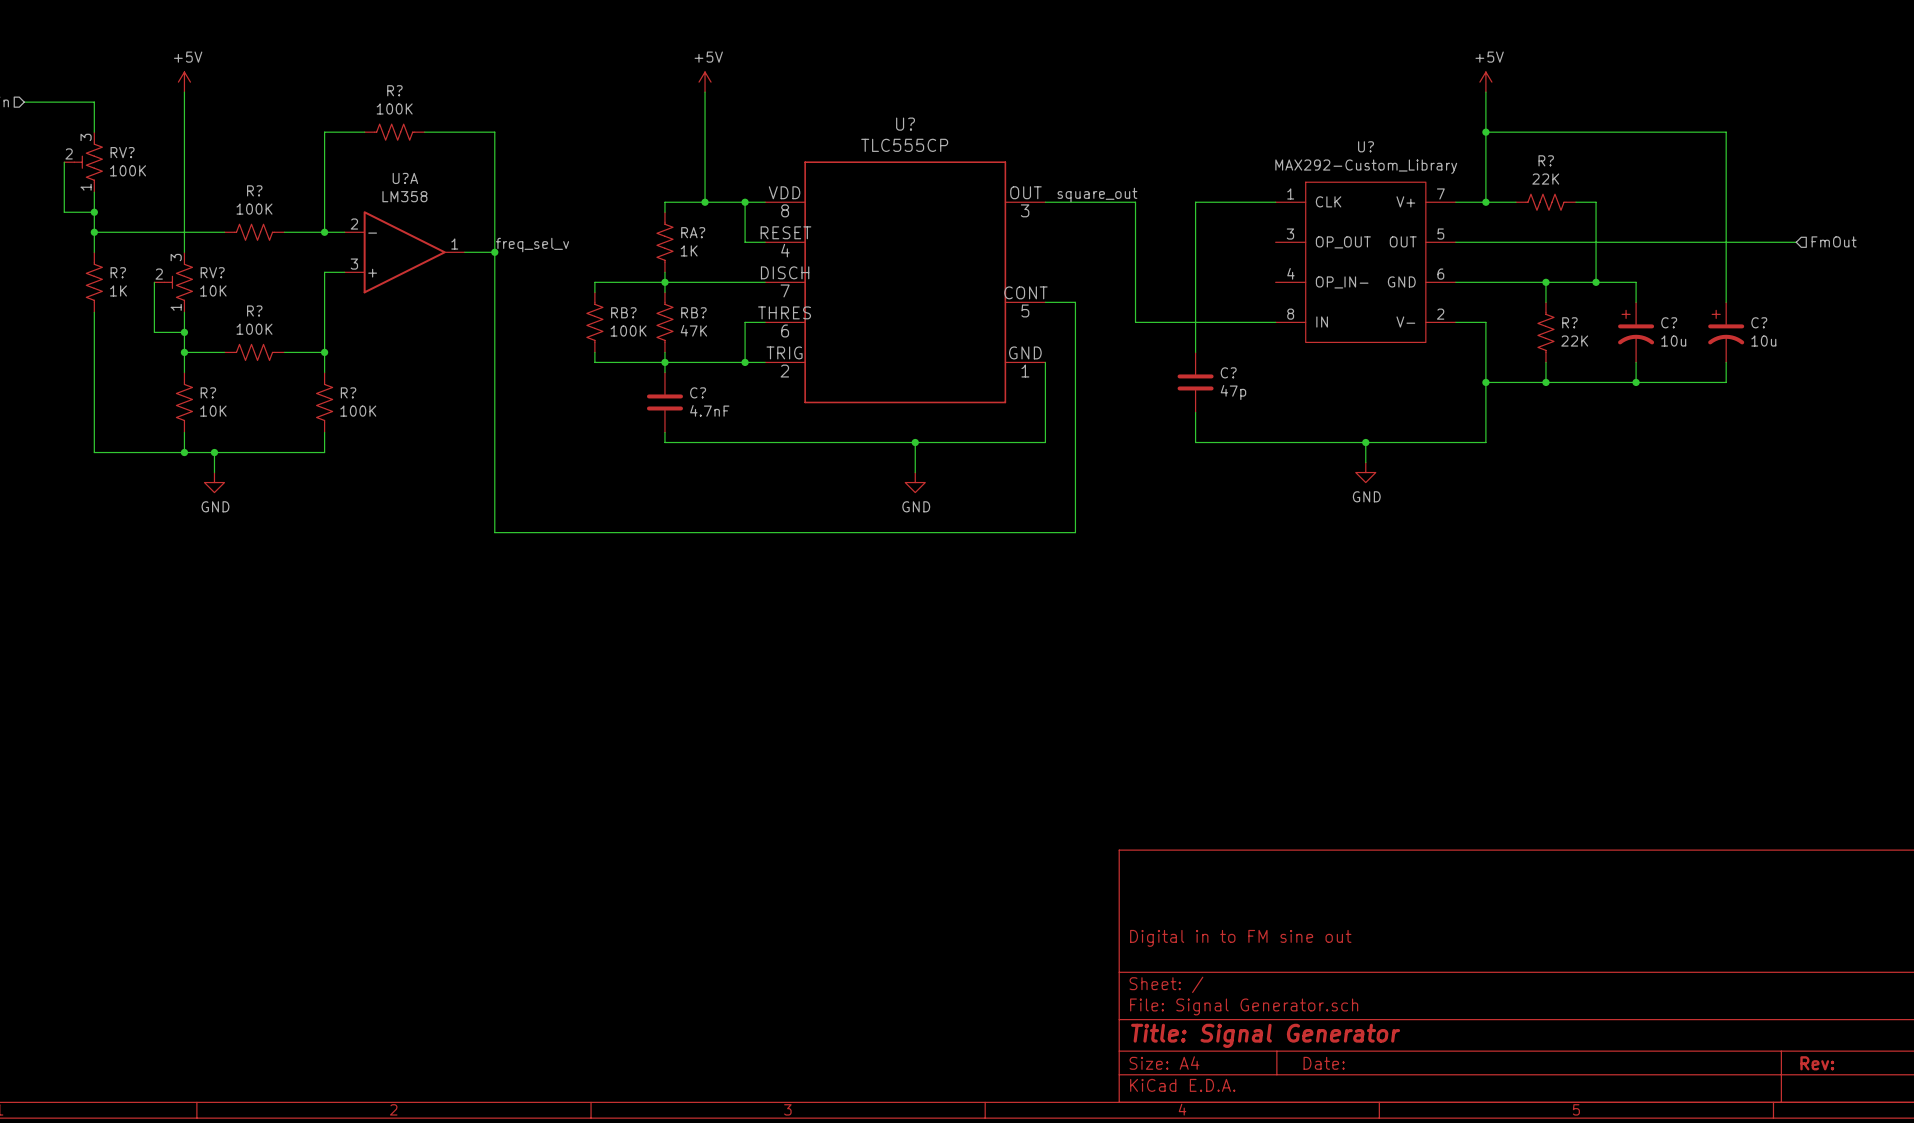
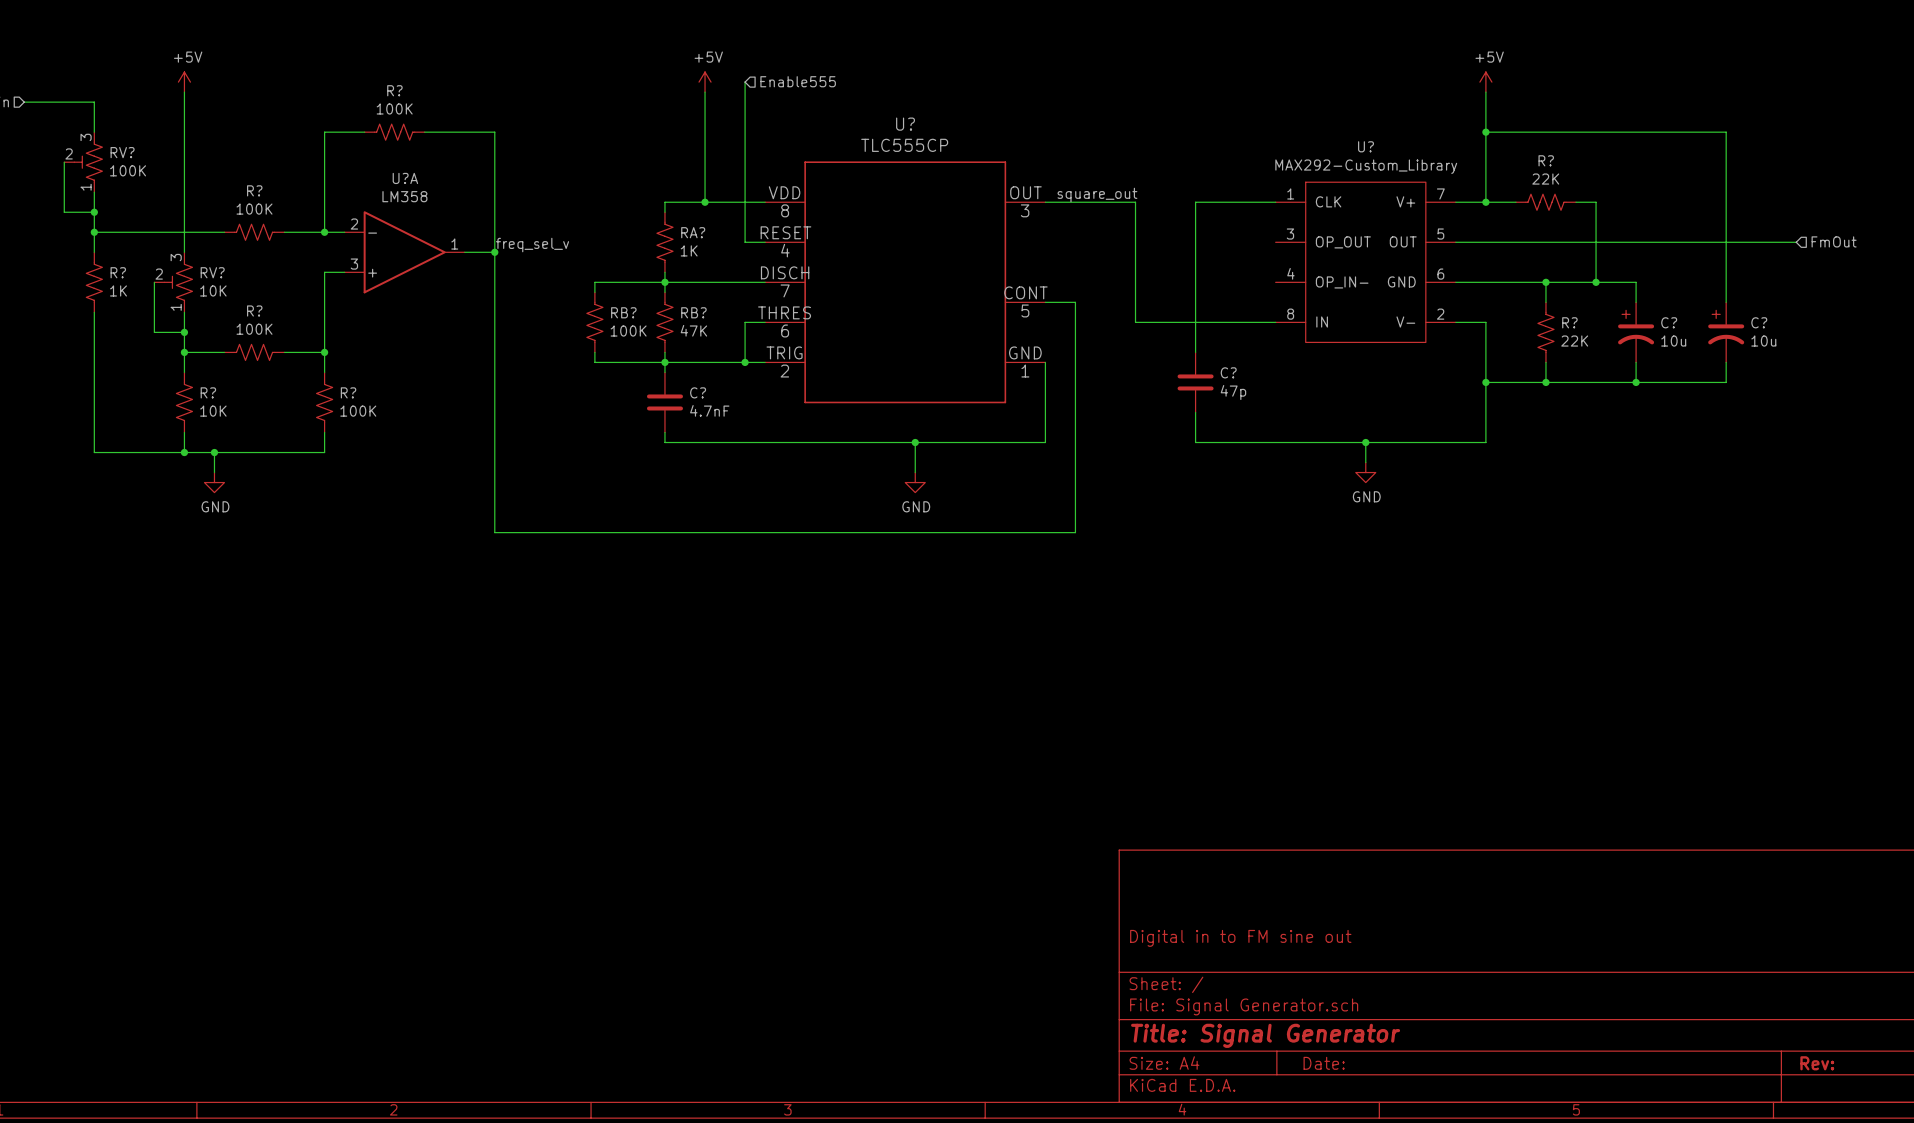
hierarchical label: none -> Enable555 (798, 81)
wire: none -> (745, 82) (745, 202)
junction: (745, 202) -> none

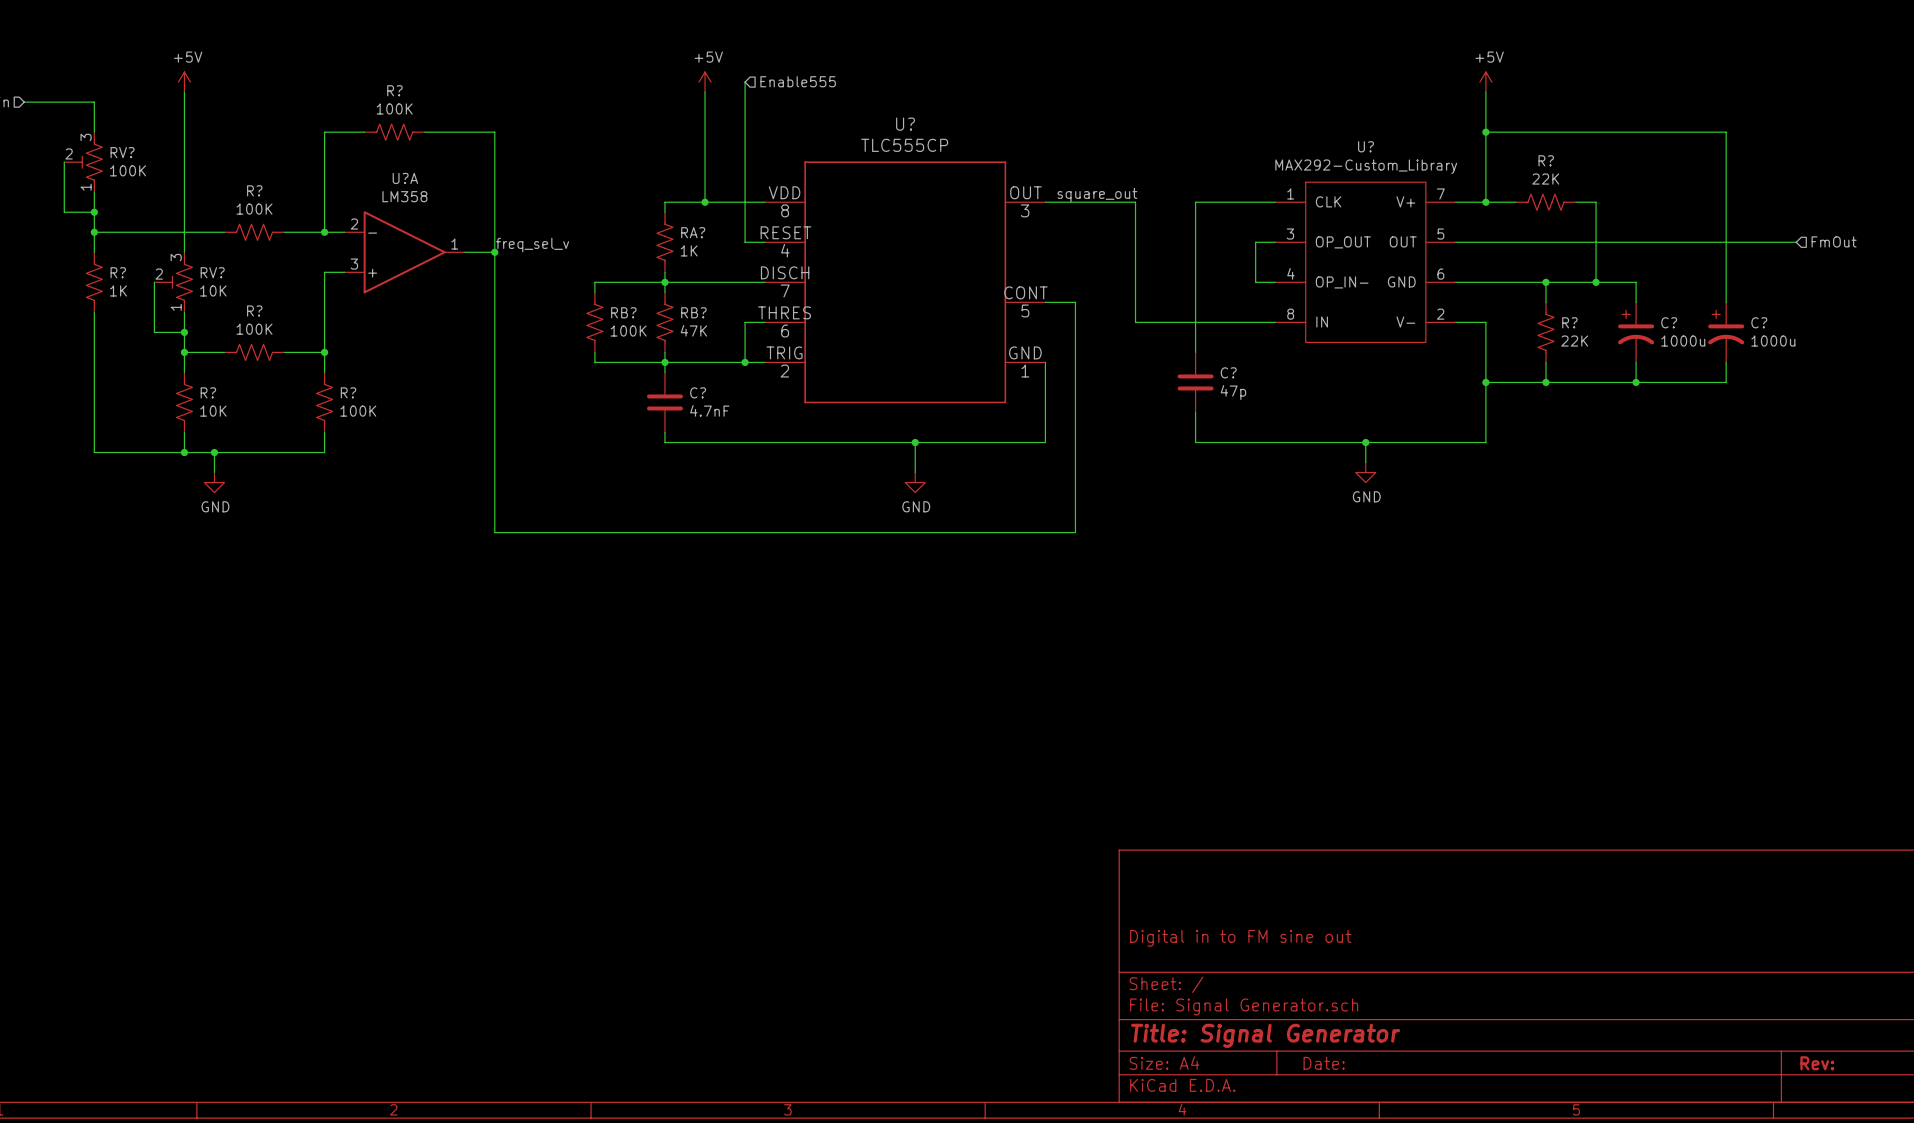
wire: none -> (1275, 242) (1255, 242) (1255, 282) (1275, 282)
C? value: 10u (1673, 341) -> 1000u (1683, 341)
C? value: 10u (1763, 341) -> 1000u (1773, 341)

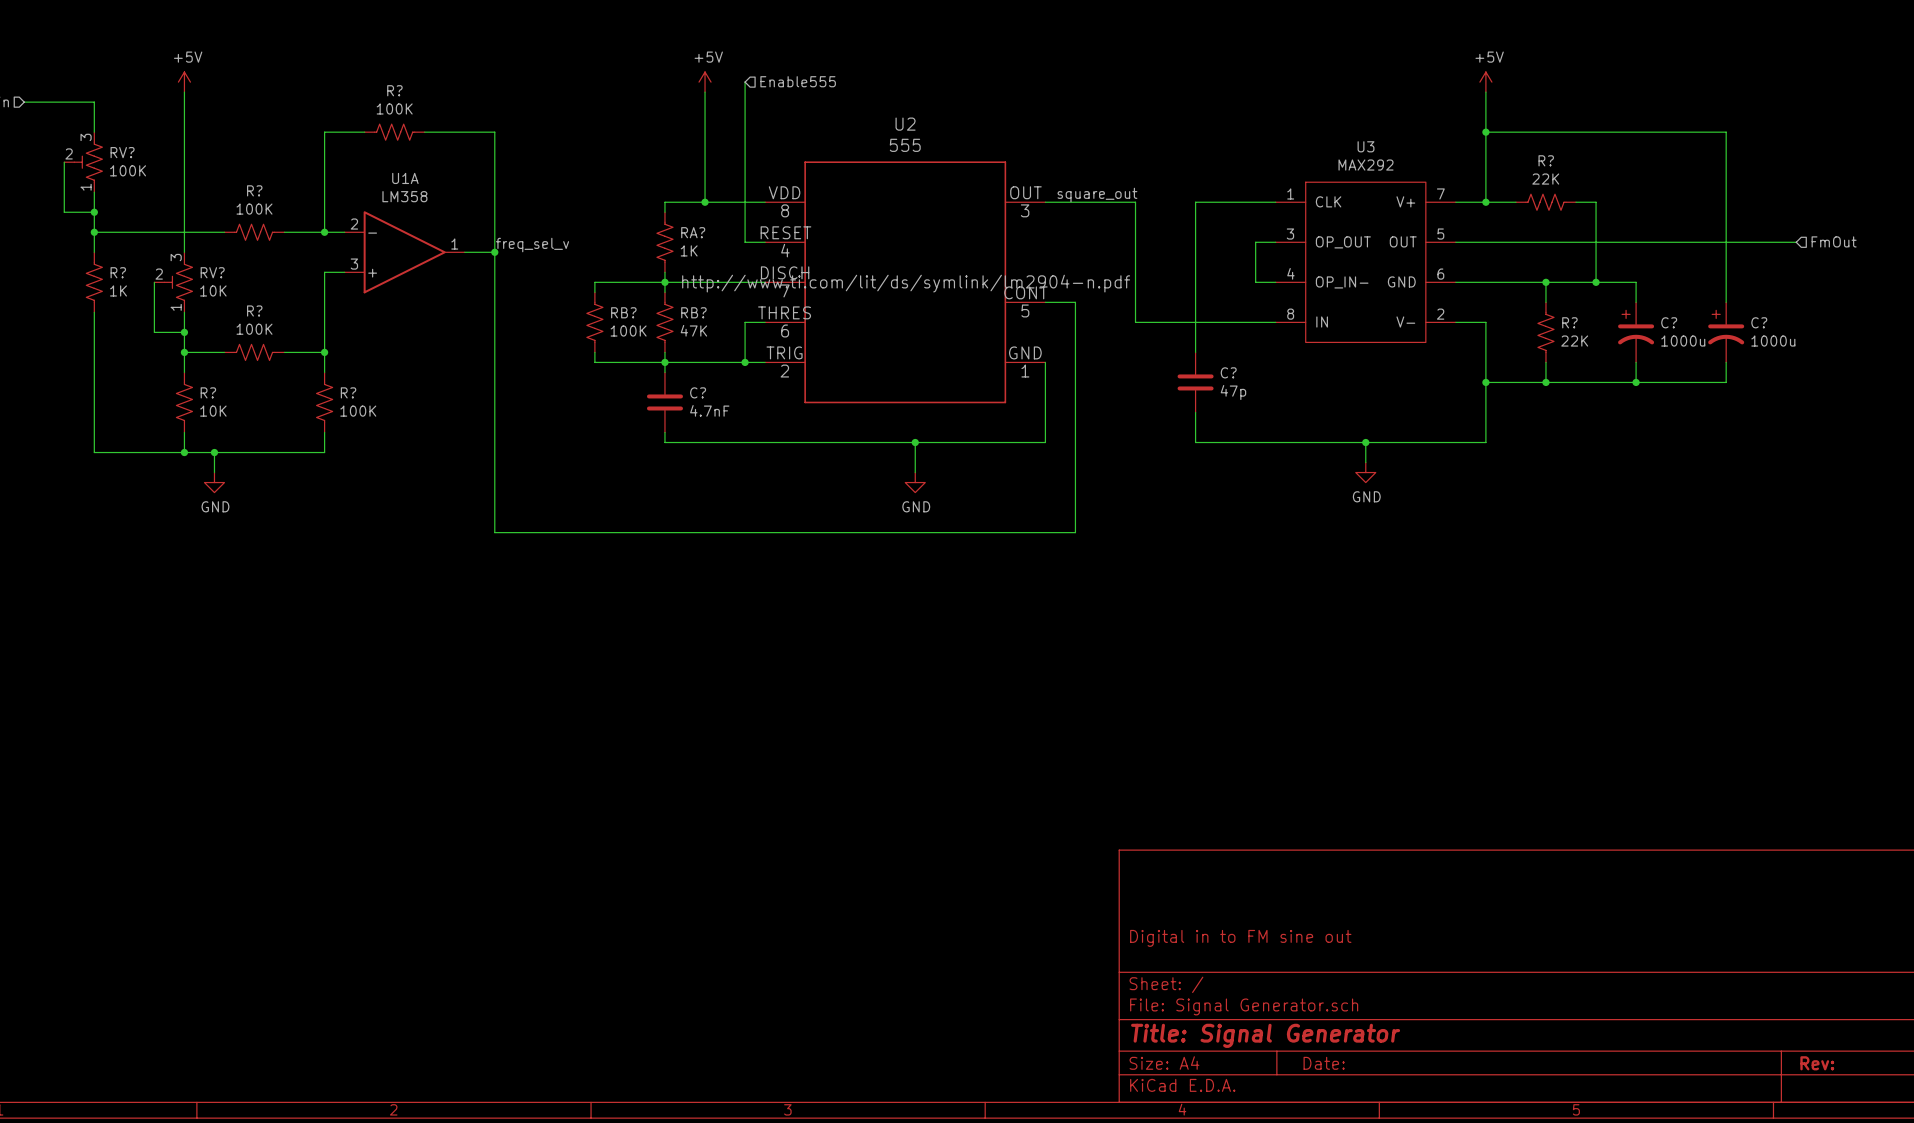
U? name: U? (905, 124) -> U2 (905, 124)
U? value: TLC555CP (904, 145) -> 555 (905, 145)
U? name: U? (1366, 146) -> U3 (1366, 146)
U? value: MAX292-Custom_Library (1366, 166) -> MAX292 (1366, 165)
U?A name: U?A (405, 178) -> U1A (405, 178)
U? text: none -> http://www.ti.com/lit/ds/symlink/lm2904-n.pdf (906, 283)

